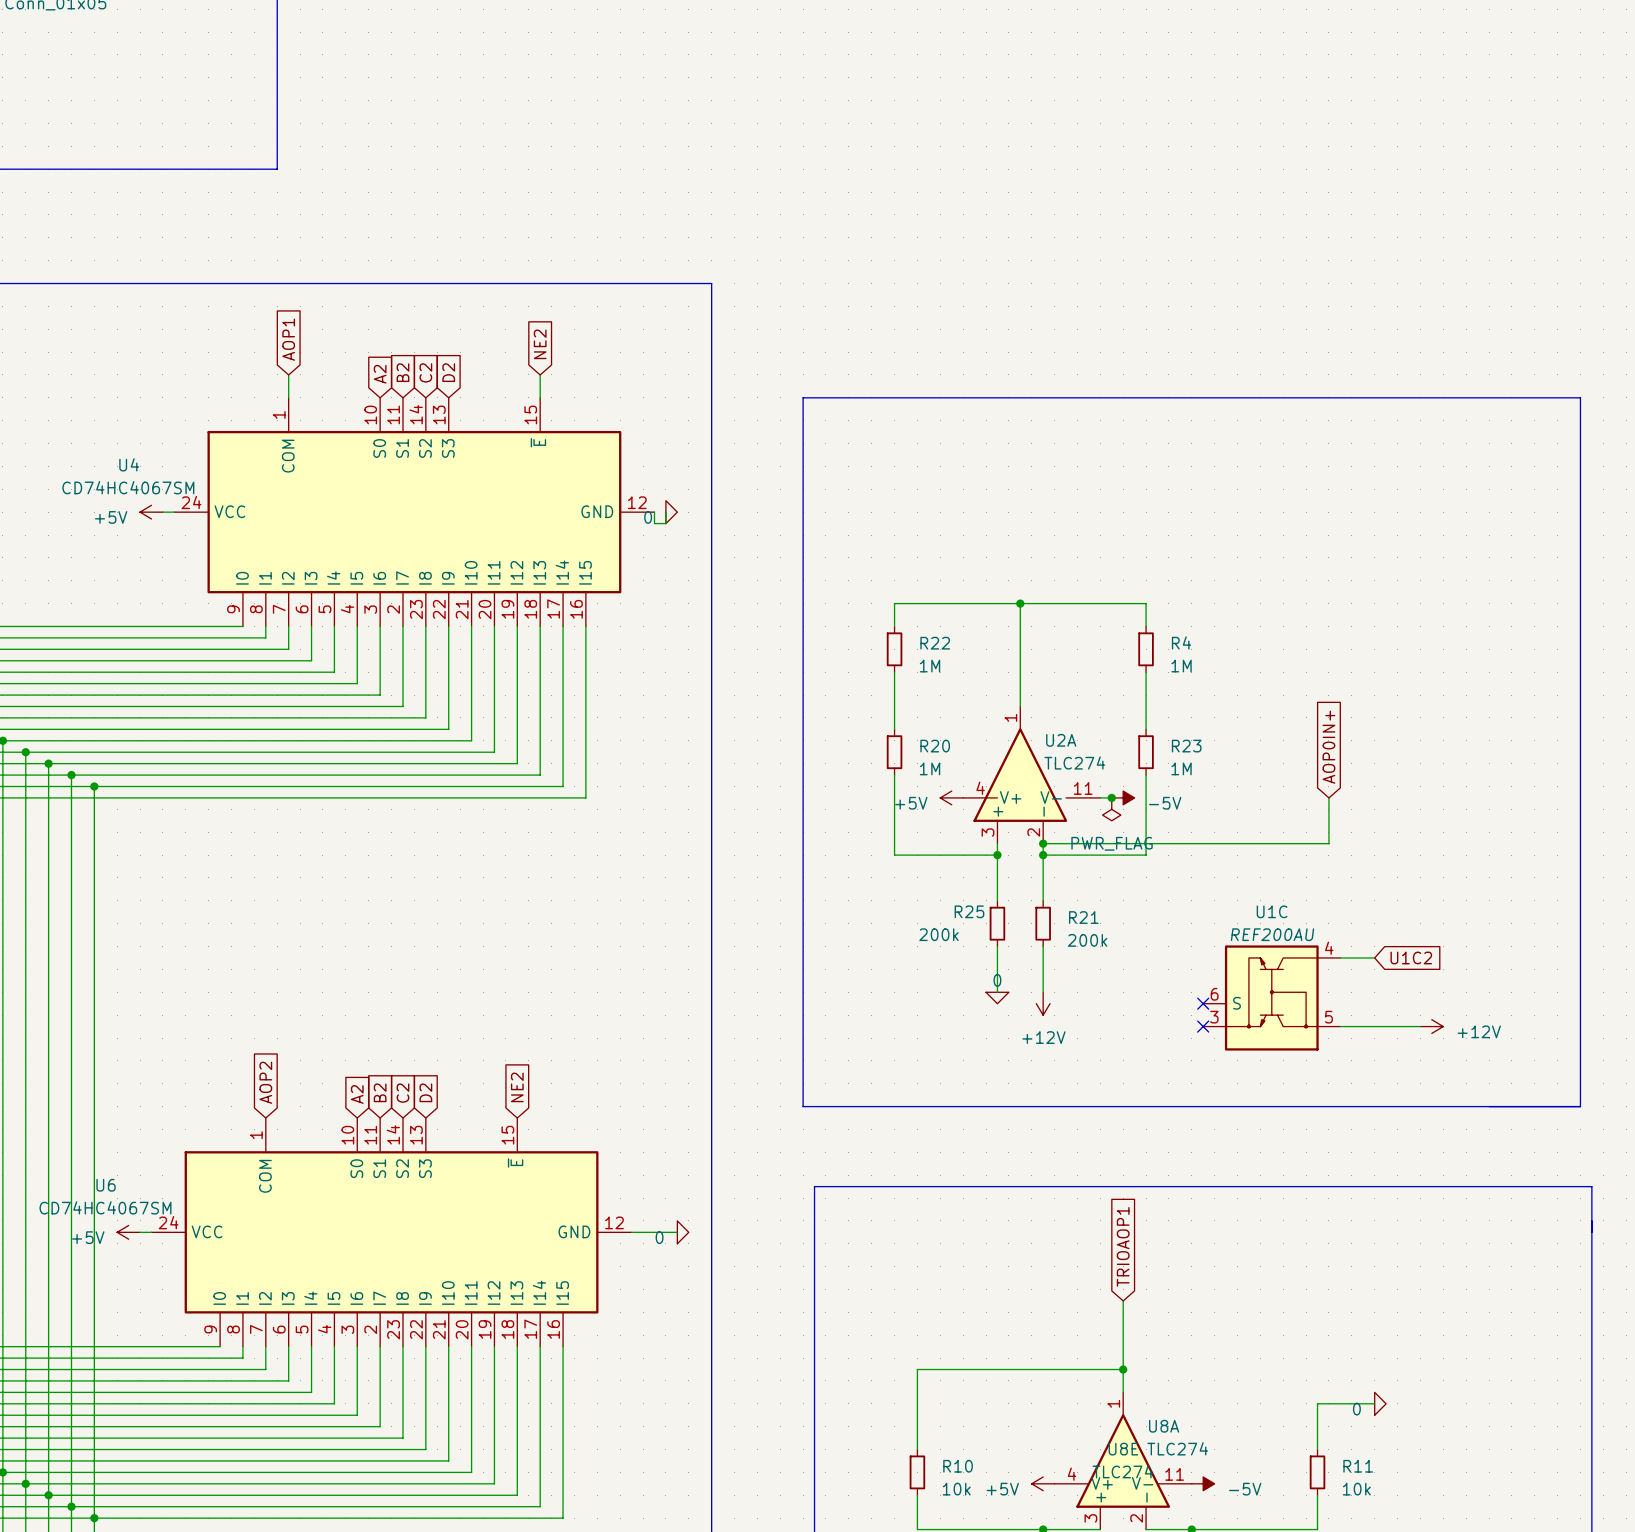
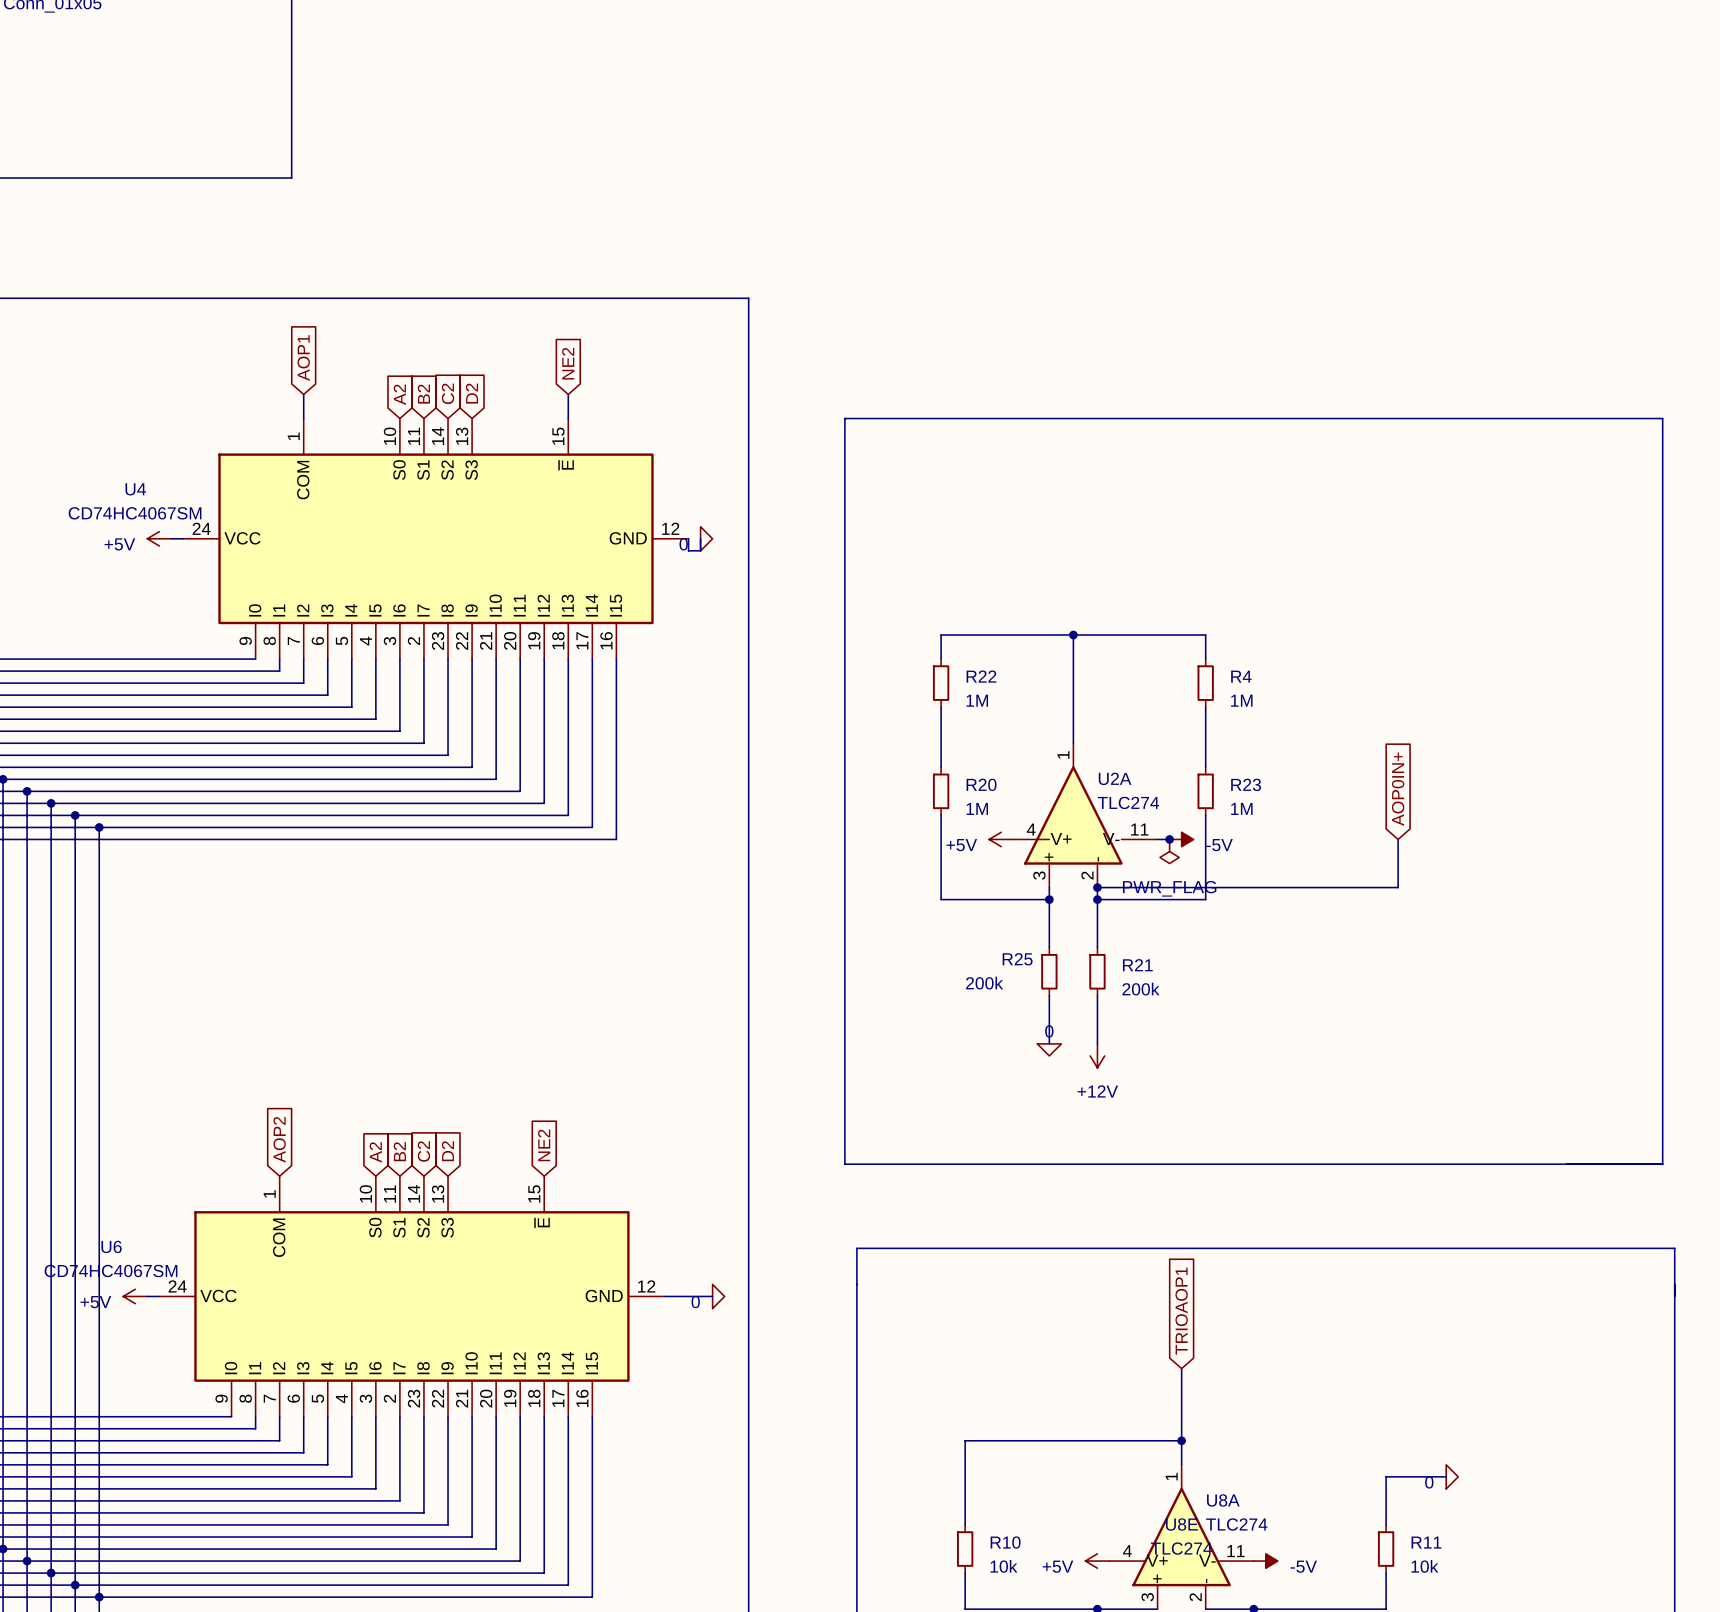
wire: (1340, 957) (1374, 957) -> none
global label: U1C2 (1411, 957) -> none
U1C: REF200AU (1271, 997) -> none
no-connect mark: (1203, 1003) -> none
no-connect mark: (1203, 1026) -> none
wire: (1340, 1026) (1420, 1026) -> none
power symbol: +12V (1431, 1026) -> none

